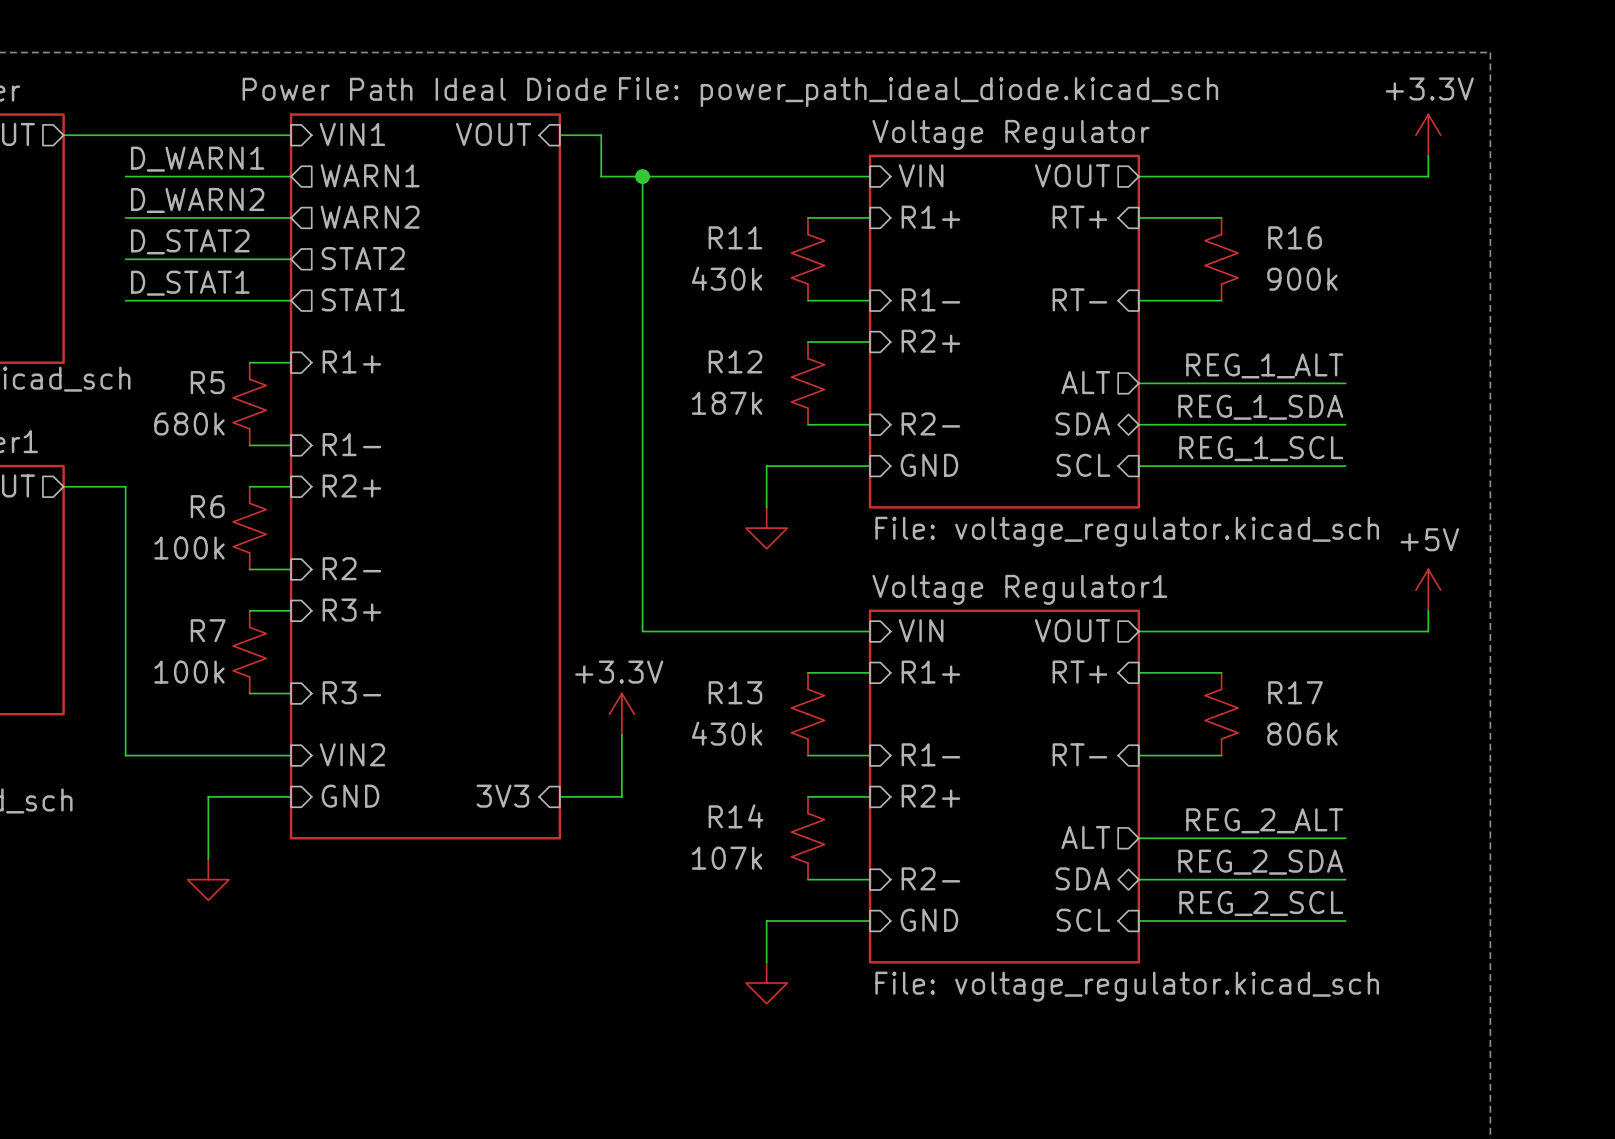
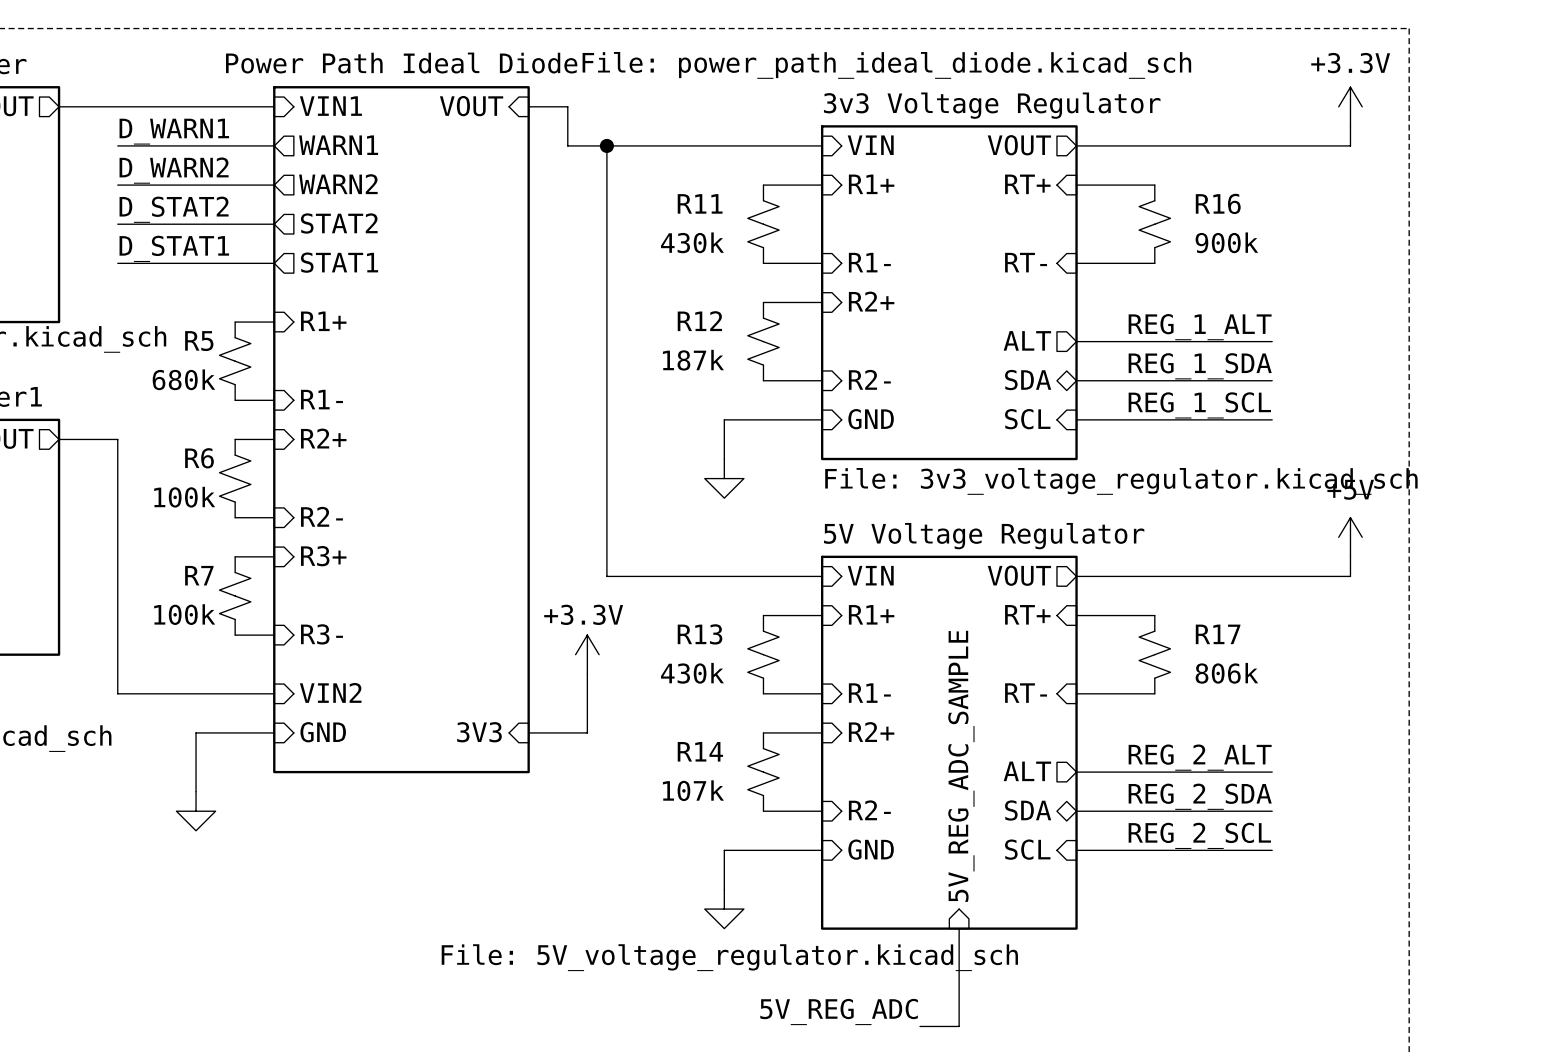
sheet Voltage Regulator name: Voltage Regulator (1010, 134) -> 3v3 Voltage Regulator (992, 105)
sheet Voltage Regulator value: File: voltage_regulator.kicad_sch (1127, 531) -> File: 3v3_voltage_regulator.kicad_sch (1121, 481)
sheet Voltage Regulator1: File: voltage_regulator.kicad_sch (1004, 786) -> none
sheet 5V Voltage Regulator: none -> File: 5V_voltage_regulator.kicad_sch (949, 742)
sheet pin: none -> 5V_REG_ADC_SAMPLE (961, 766)
wire: none -> (959, 928) (959, 1026) (920, 1026)
label: none -> 5V_REG_ADC (839, 1011)

